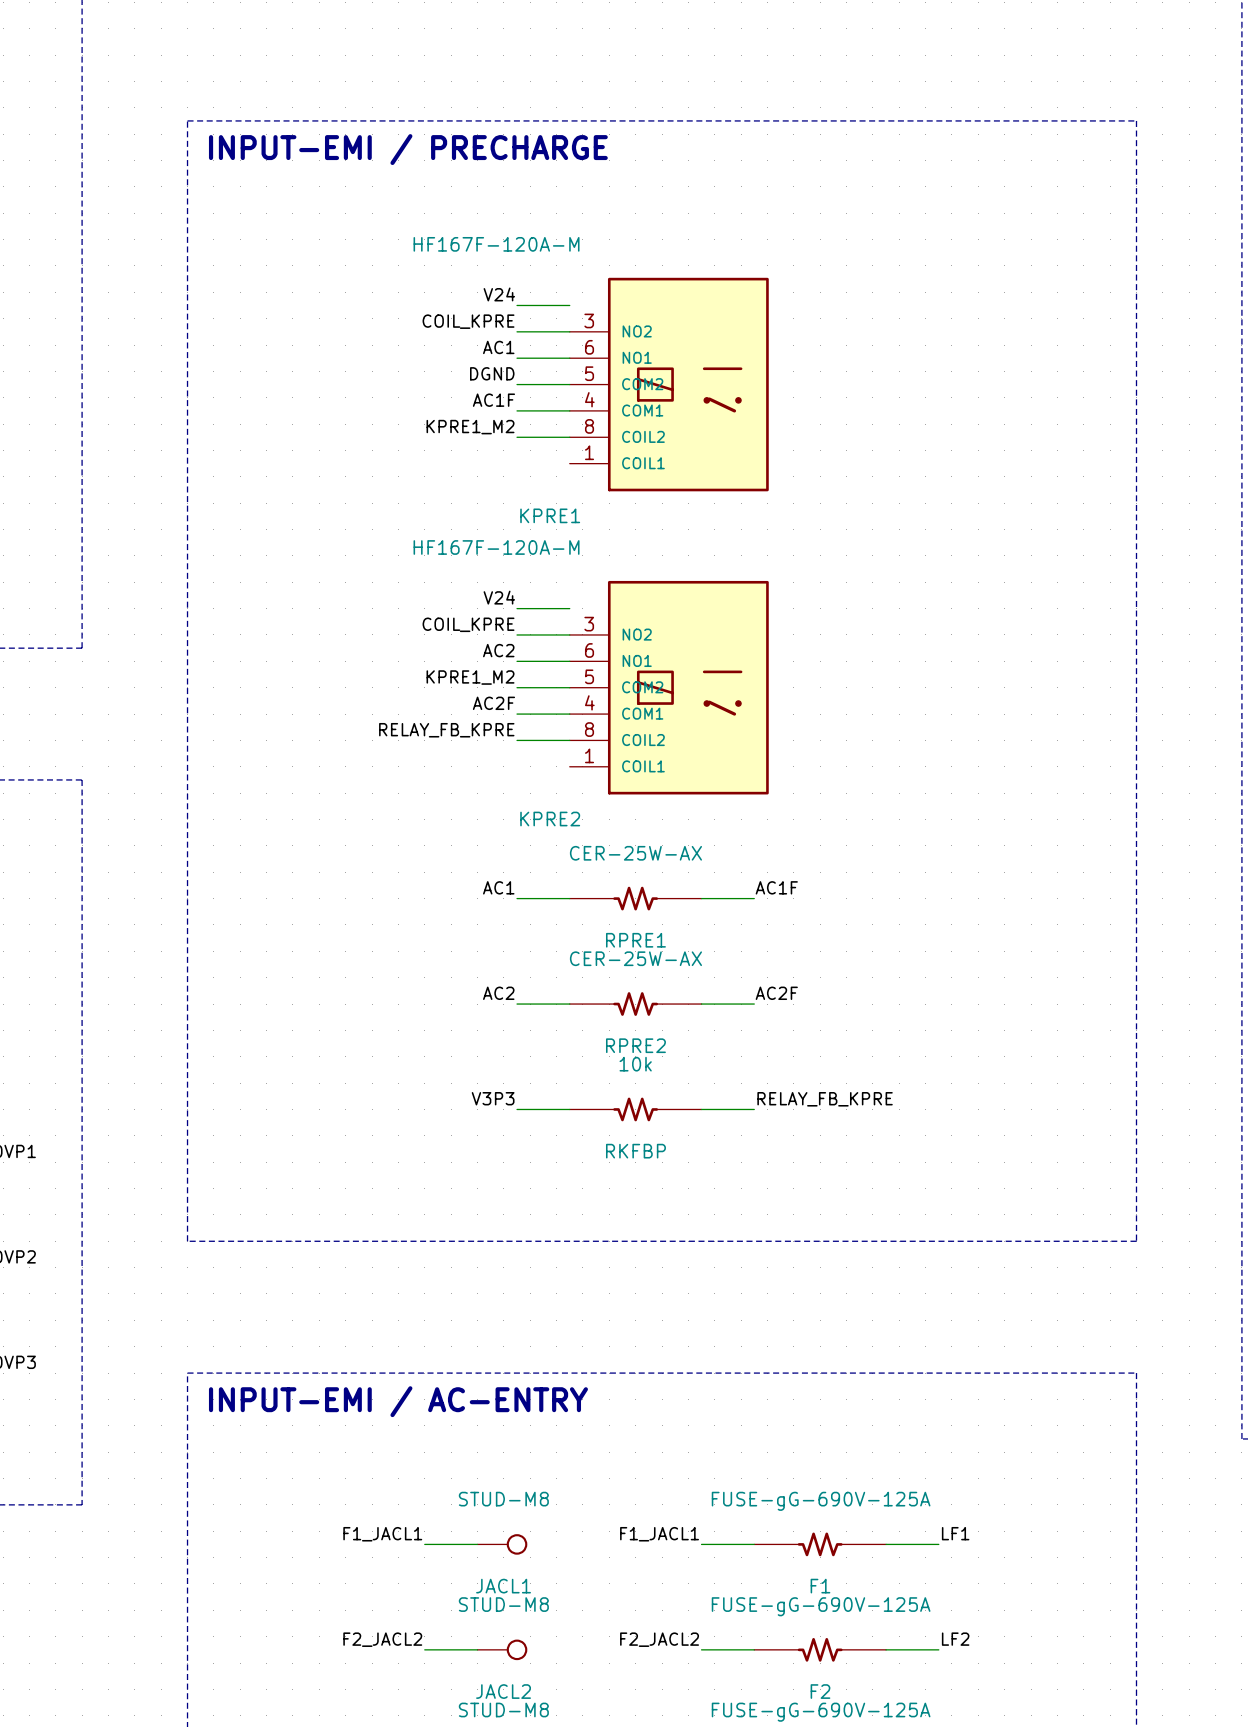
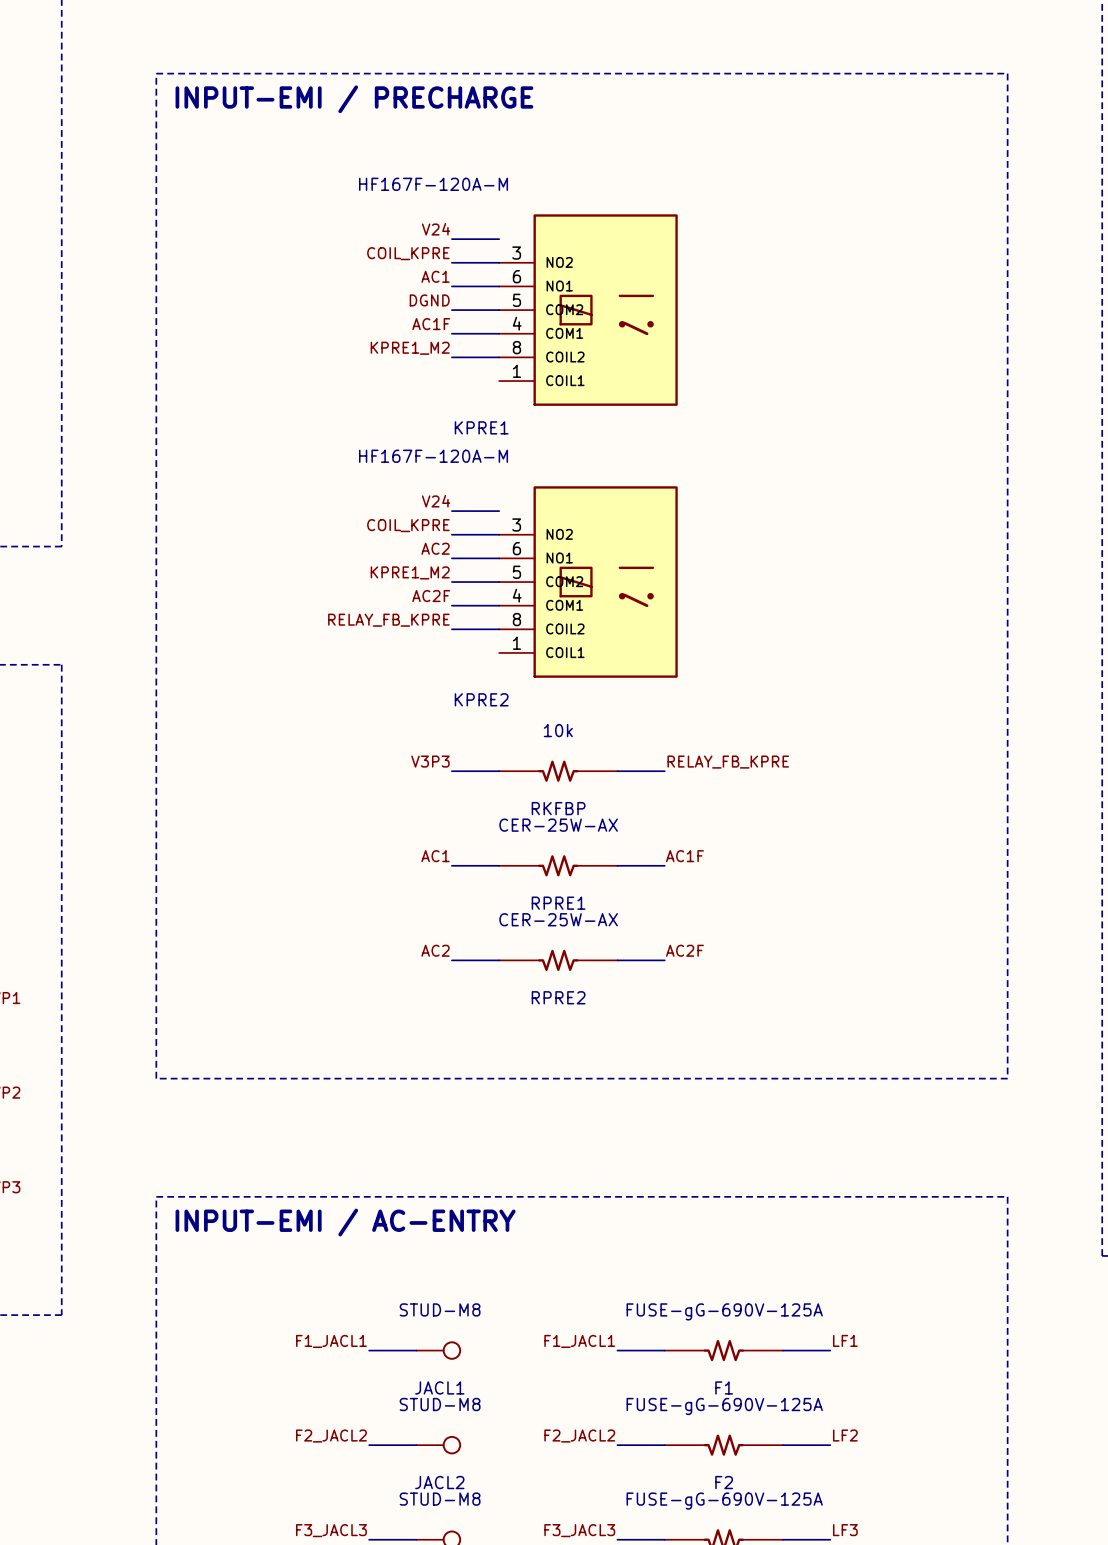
RPRE1 value: CER-25W-AX (635, 853) -> 10k (558, 730)
label: AC1 (498, 887) -> V3P3 (430, 761)
label: AC1F (776, 887) -> RELAY_FB_KPRE (728, 762)
RPRE1 name: RPRE1 (635, 940) -> RKFBP (558, 808)
label: AC2 (498, 993) -> AC1 (435, 856)
label: AC2F (776, 993) -> AC1F (684, 856)
RPRE2 name: RPRE2 (635, 1045) -> RPRE1 (558, 903)
RKFBP value: 10k (635, 1064) -> CER-25W-AX (558, 919)
label: V3P3 (493, 1098) -> AC2 (435, 950)
label: RELAY_FB_KPRE (825, 1099) -> AC2F (684, 950)
RKFBP name: RKFBP (635, 1151) -> RPRE2 (558, 997)

